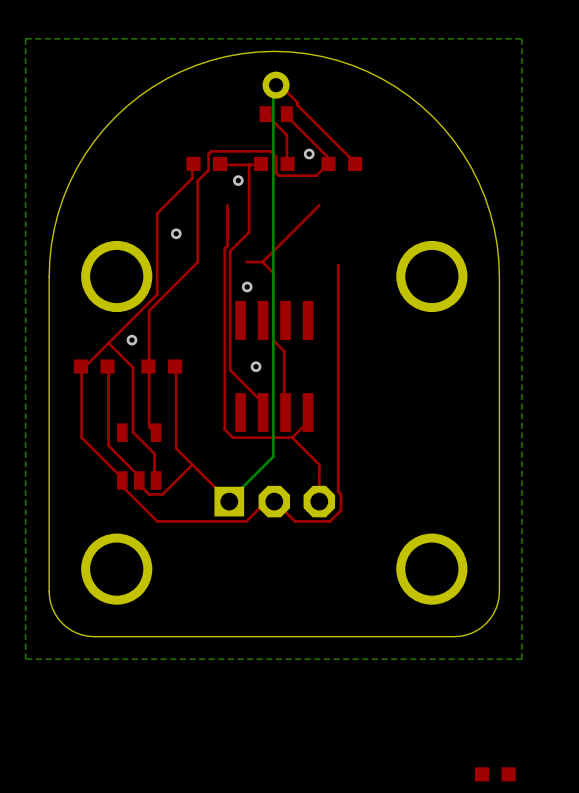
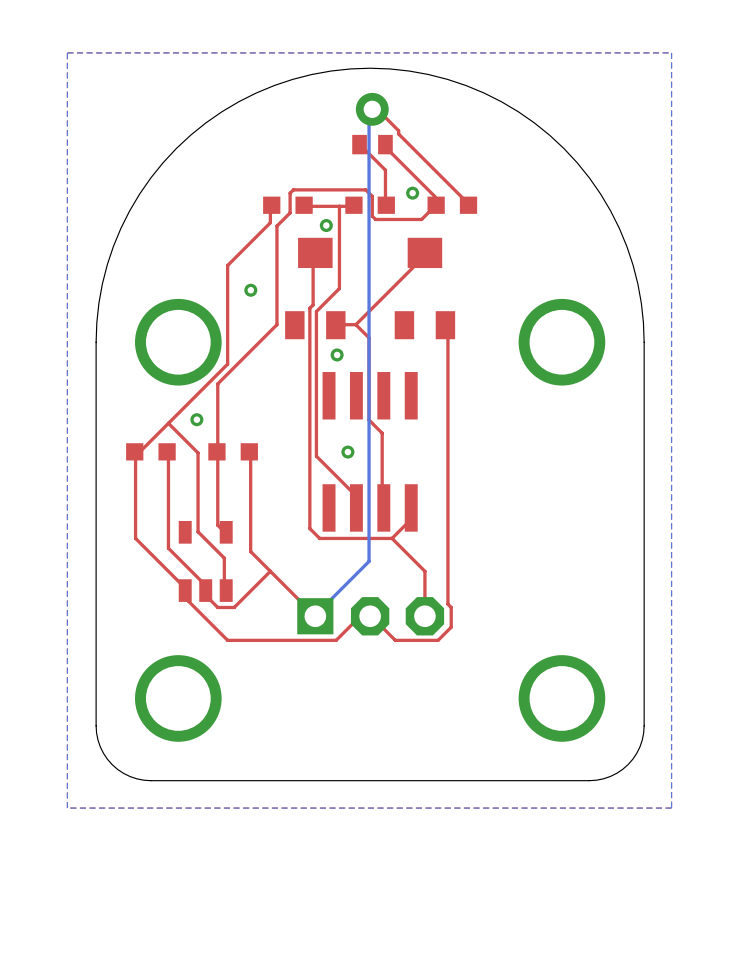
part: none -> (315, 288)
part: none -> (424, 288)
part: (495, 774) -> none

